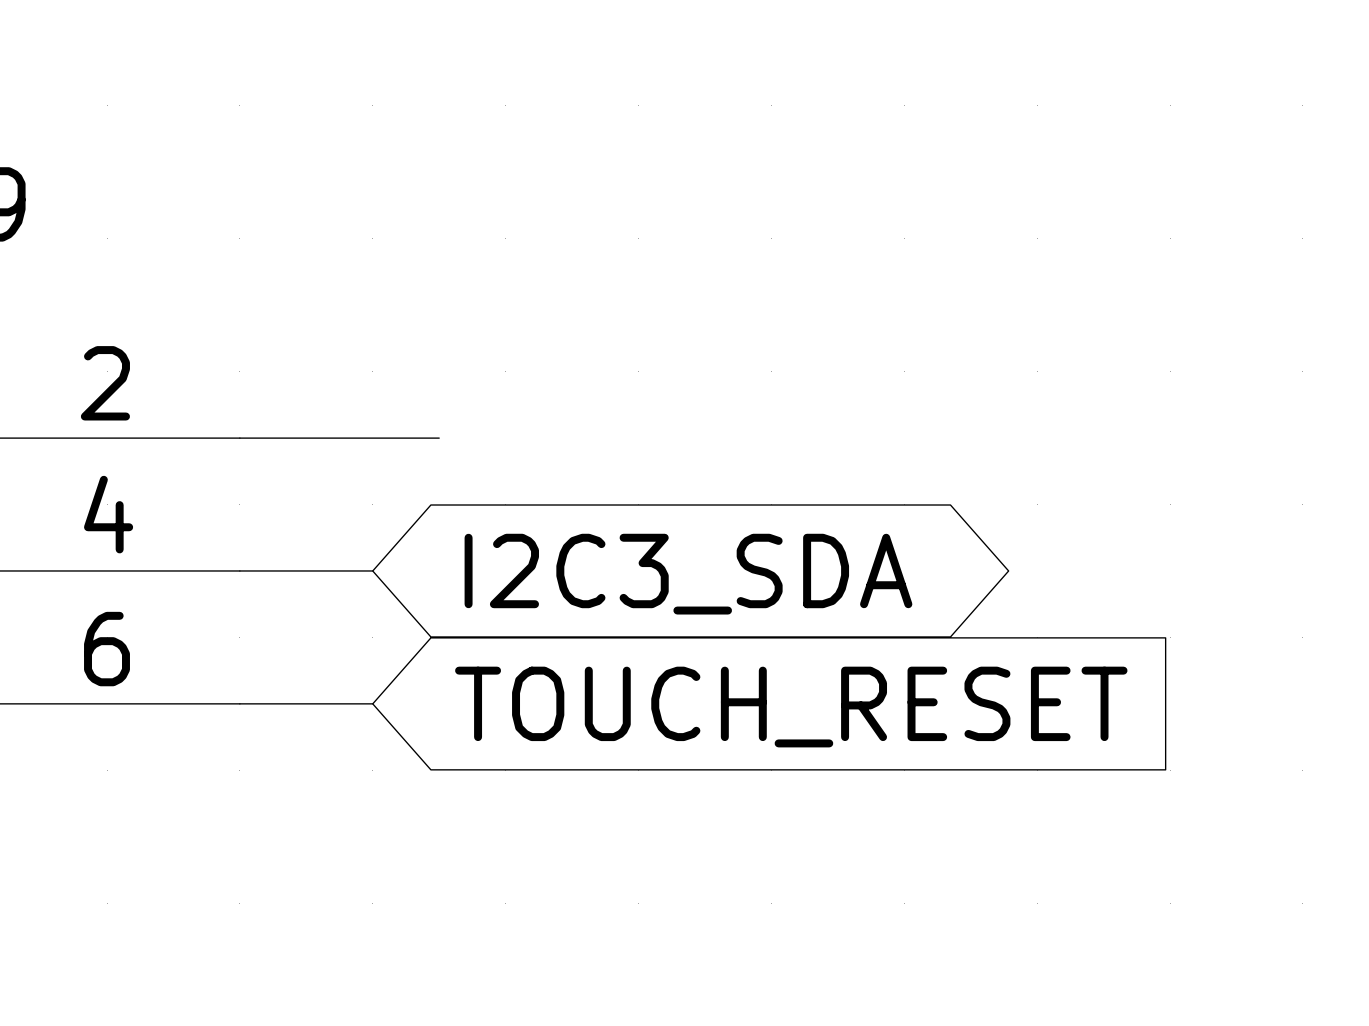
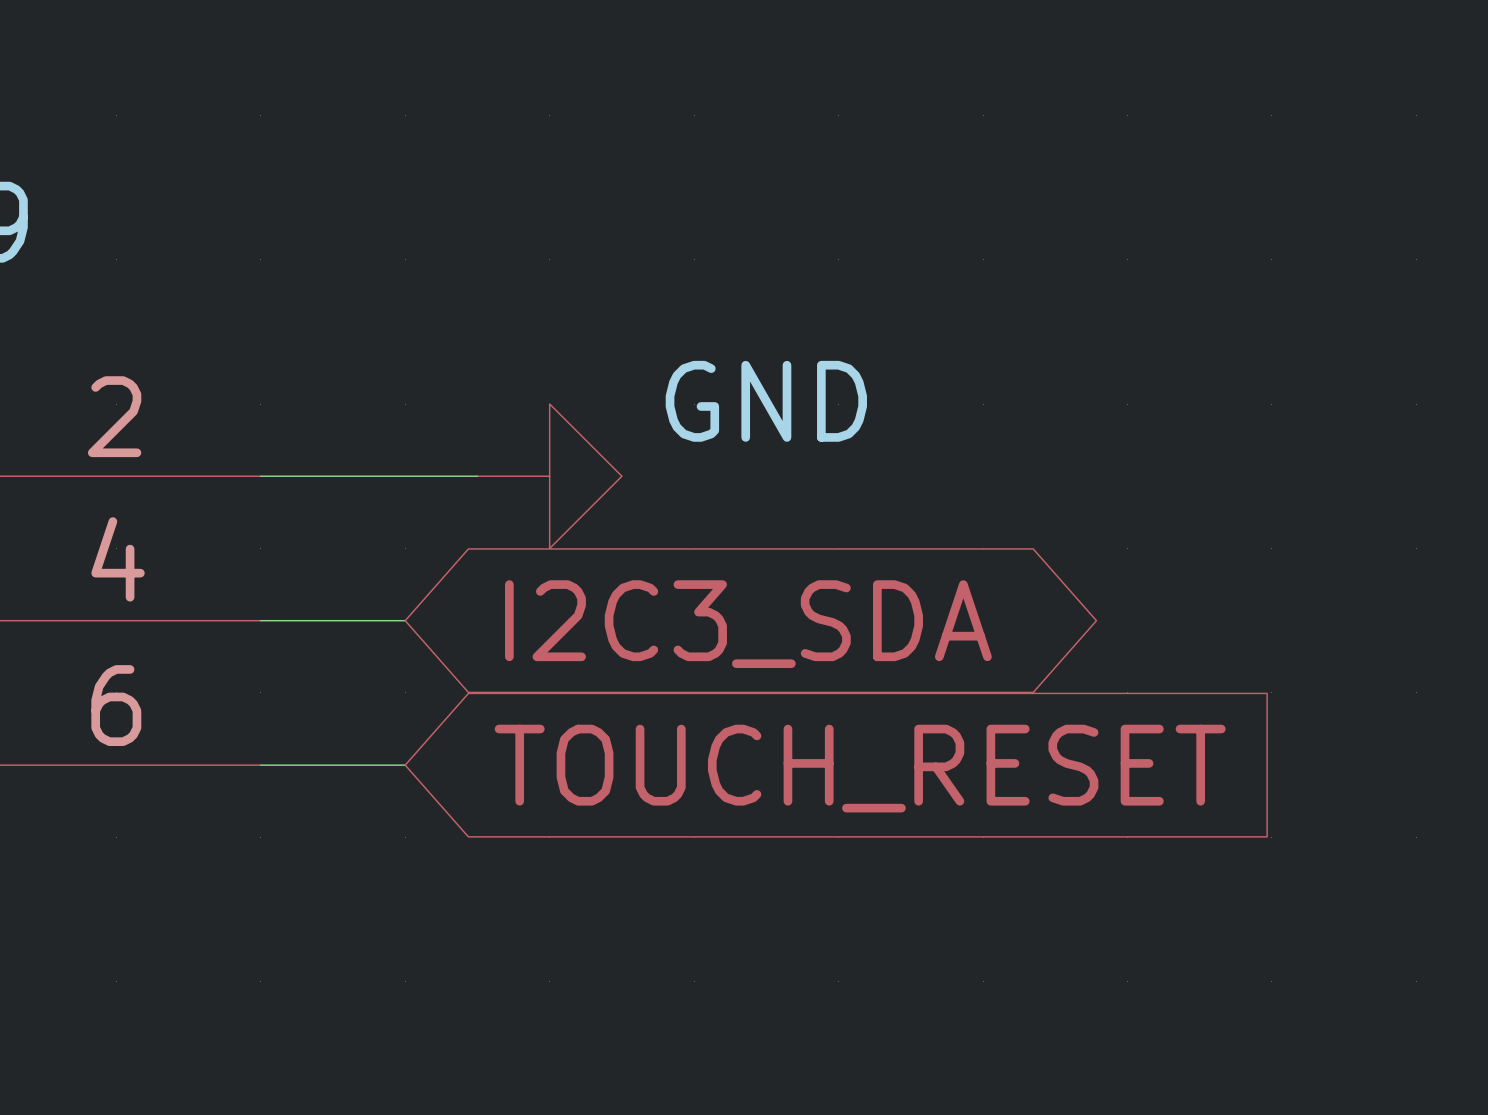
power symbol: none -> GND (549, 476)

